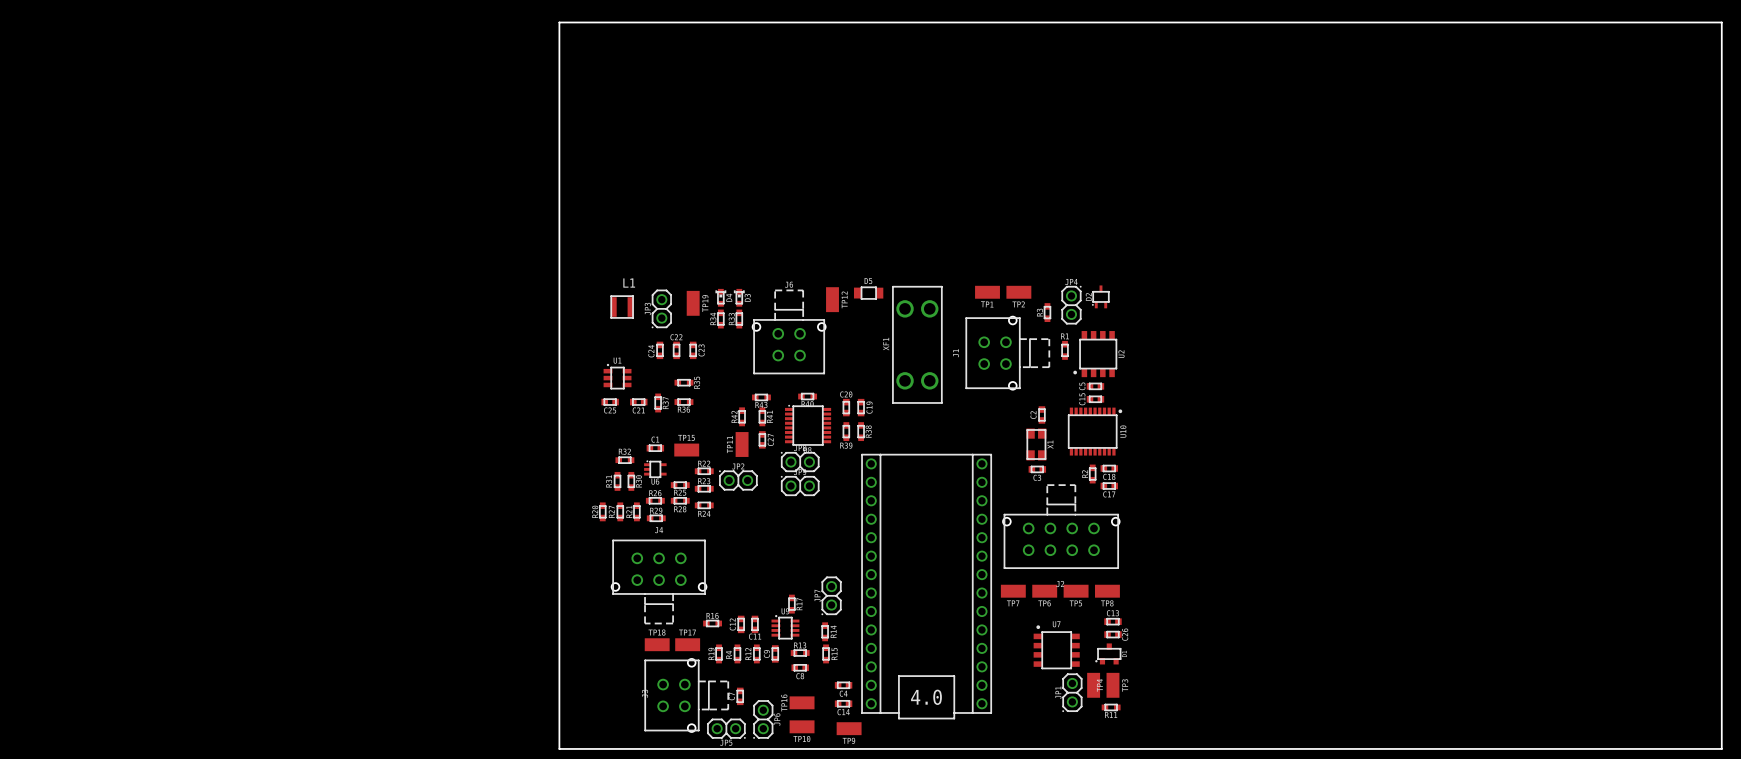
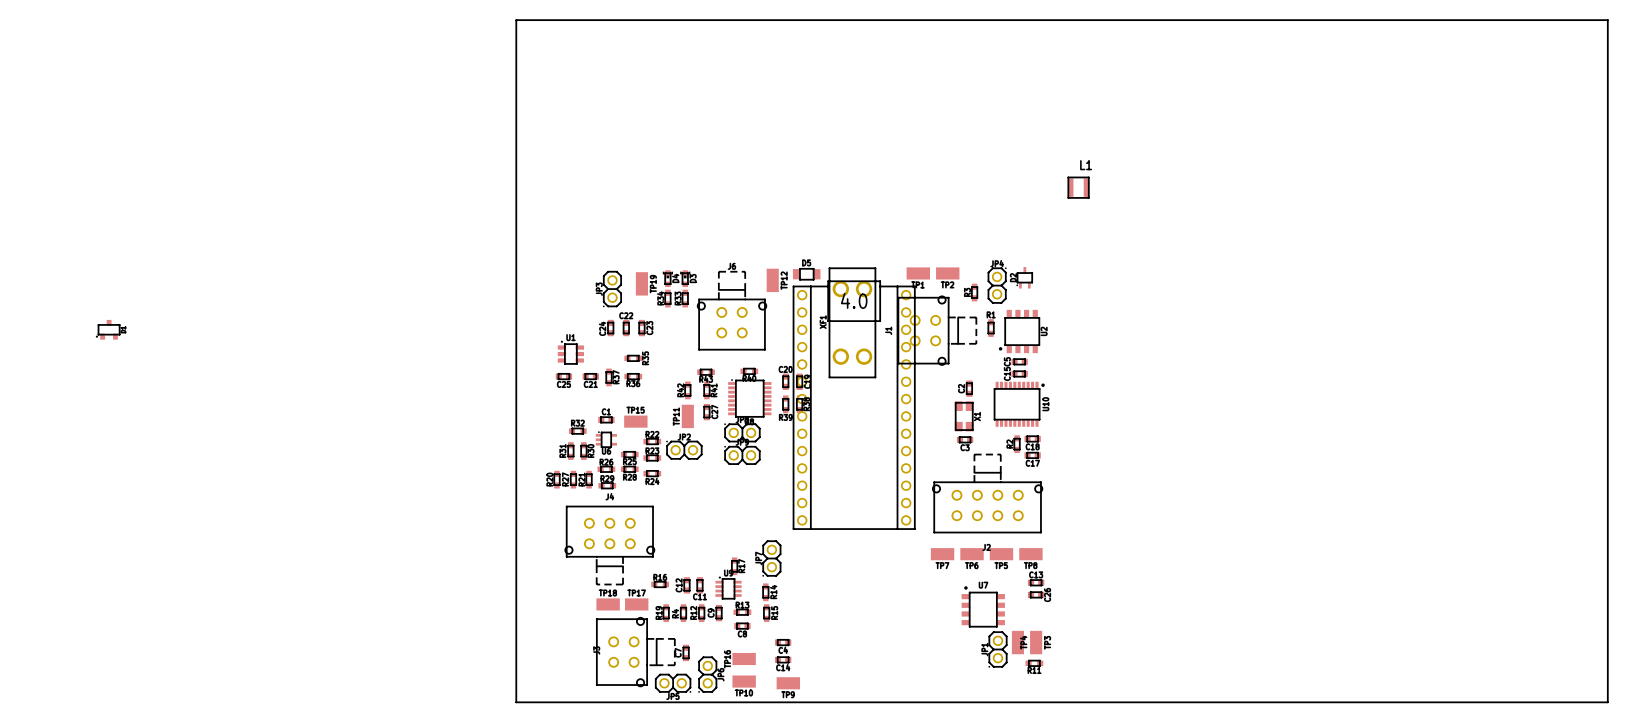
L1 position: (622, 307) -> (1078, 187)
part rotation: 0° (926, 586) -> 180° (854, 405)
part position: (1108, 653) -> (107, 329)

